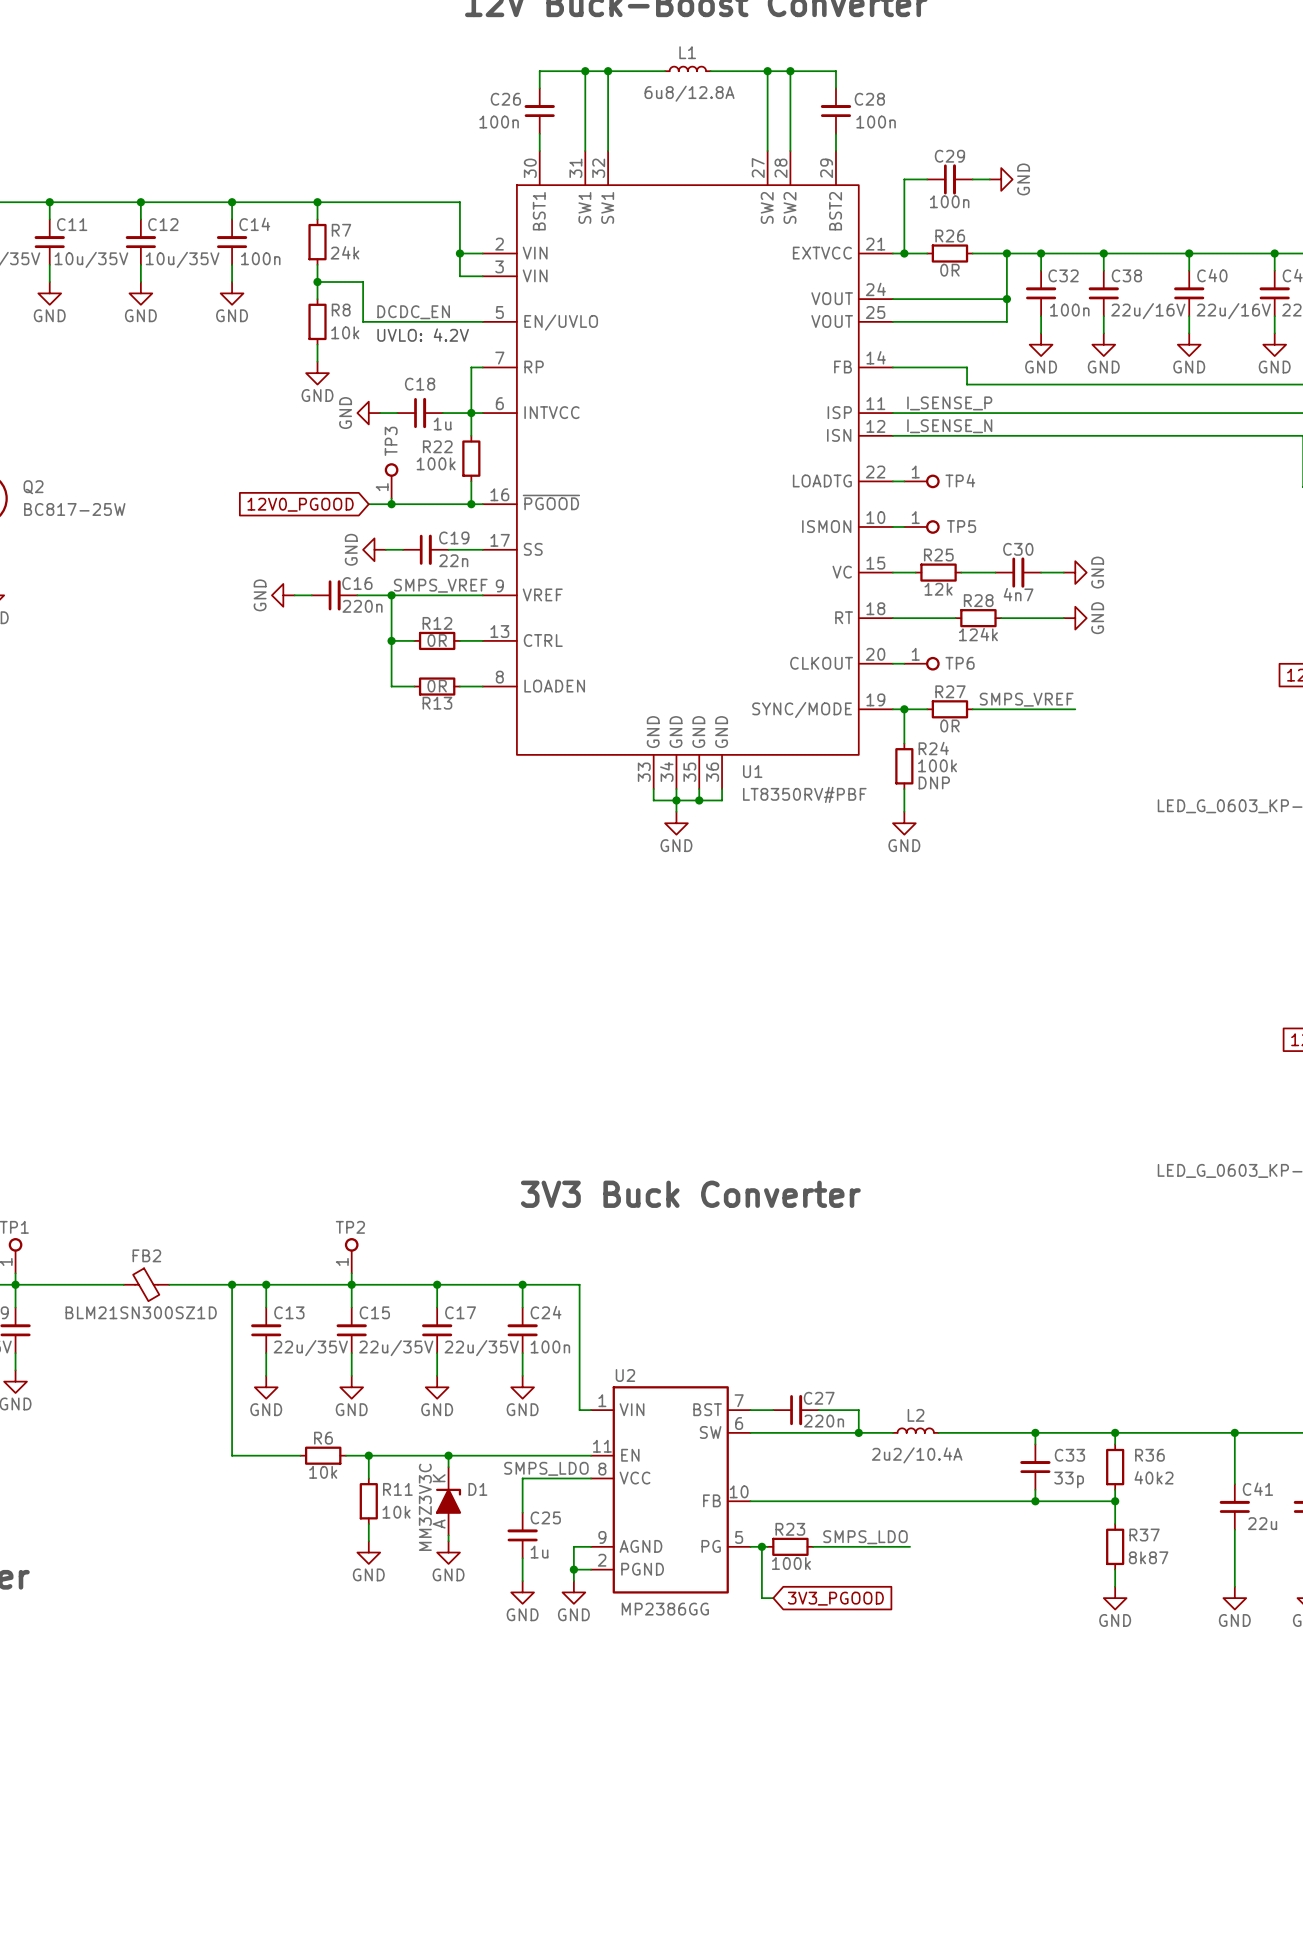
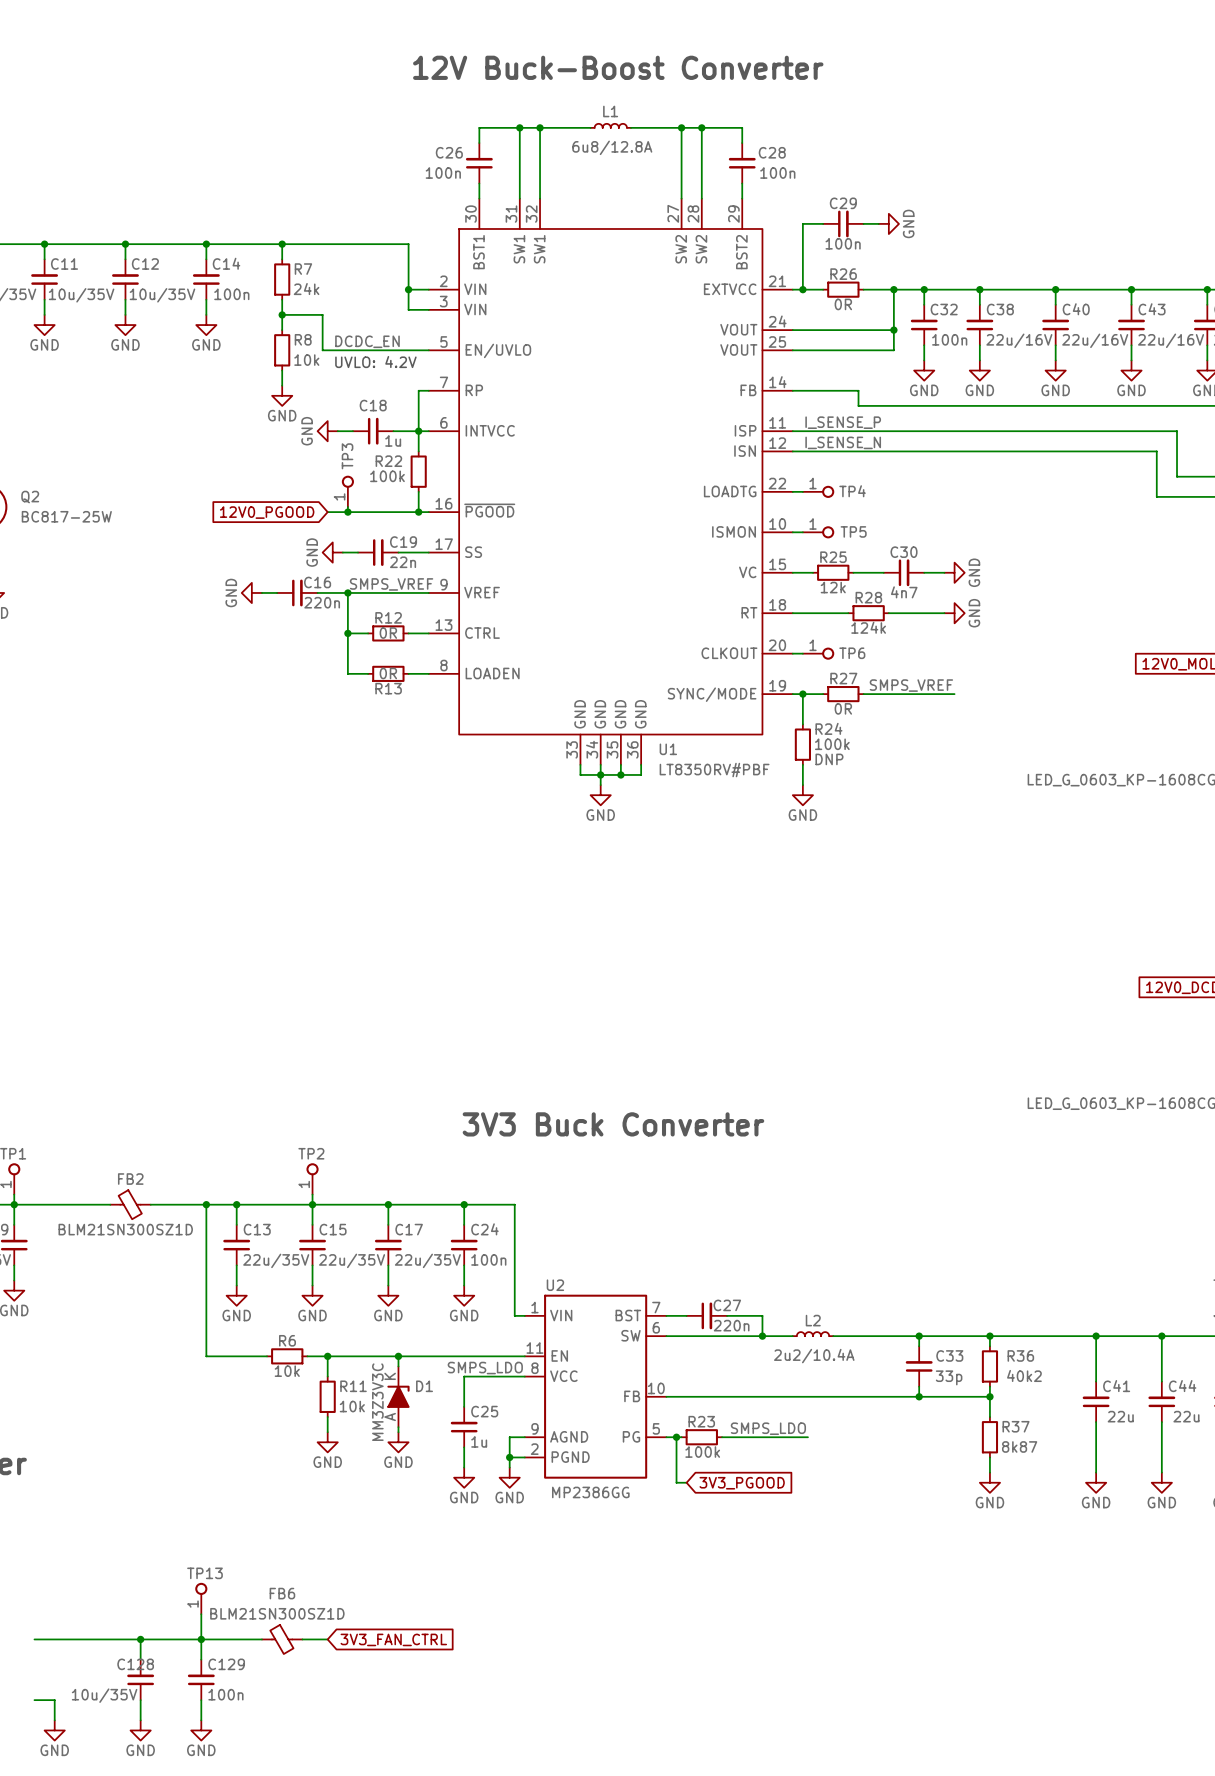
TP13: none -> (201, 1598)
wire: none -> (201, 1614) (201, 1659)
wire: none -> (34, 1639) (261, 1639)
wire: none -> (140, 1639) (140, 1659)
junction: none -> (140, 1639)
junction: none -> (201, 1639)
FB6: none -> BLM21SN300SZ1D (282, 1639)
wire: none -> (302, 1639) (327, 1639)
global label: none -> 3V3_FAN_CTRL (393, 1639)
C128: none -> (140, 1679)
C129: none -> (201, 1679)
wire: none -> (34, 1700) (54, 1700) (54, 1720)
wire: none -> (140, 1700) (140, 1720)
wire: none -> (201, 1700) (201, 1720)
power symbol: none -> GND (54, 1730)
power symbol: none -> GND (140, 1730)
power symbol: none -> GND (201, 1730)

